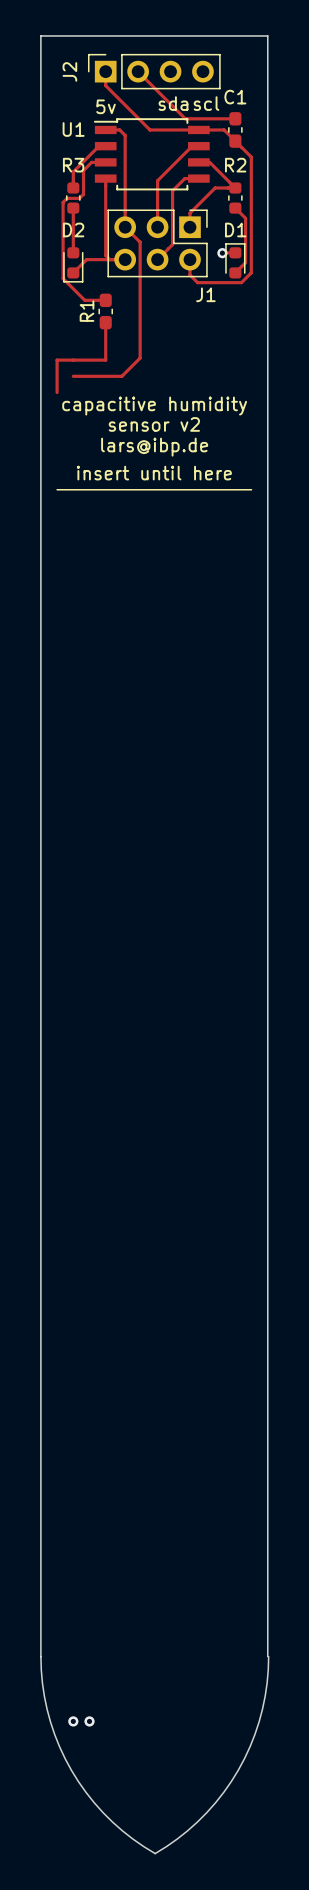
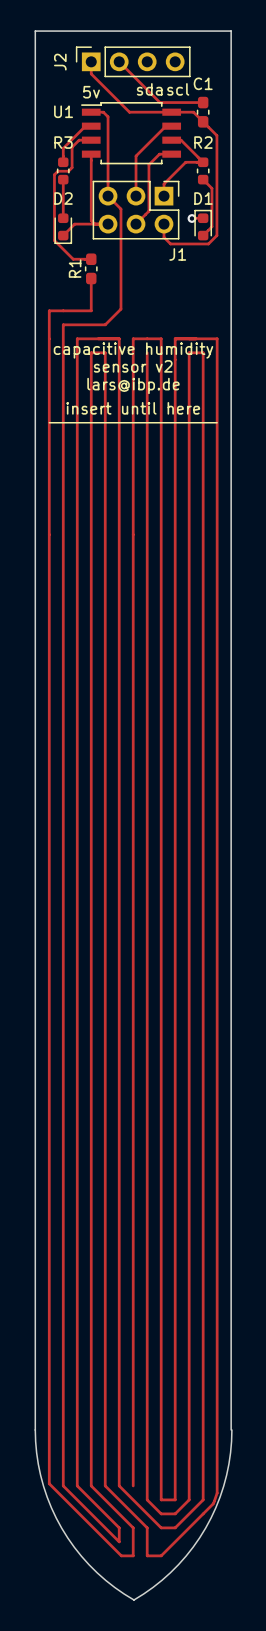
track: none -> (63, 324) (63, 1485) (119, 1541) (119, 1527) (77, 1485) (77, 338) (119, 338) (119, 1485) (161, 1527) (175, 1527) (203, 1499) (203, 352) (189, 352) (189, 1499) (175, 1513) (161, 1513) (147, 1499) (147, 352)
track: none -> (49, 338) (49, 1483) (121, 1555) (133, 1555) (133, 1527) (91, 1485) (91, 352) (105, 352) (105, 1485) (147, 1527) (147, 1555) (161, 1555) (213, 1503) (217, 1493) (217, 338) (175, 338) (175, 1499) (161, 1499) (161, 338) (133, 338) (133, 1485)
via: (73, 1721) -> none
via: (89, 1721) -> none

